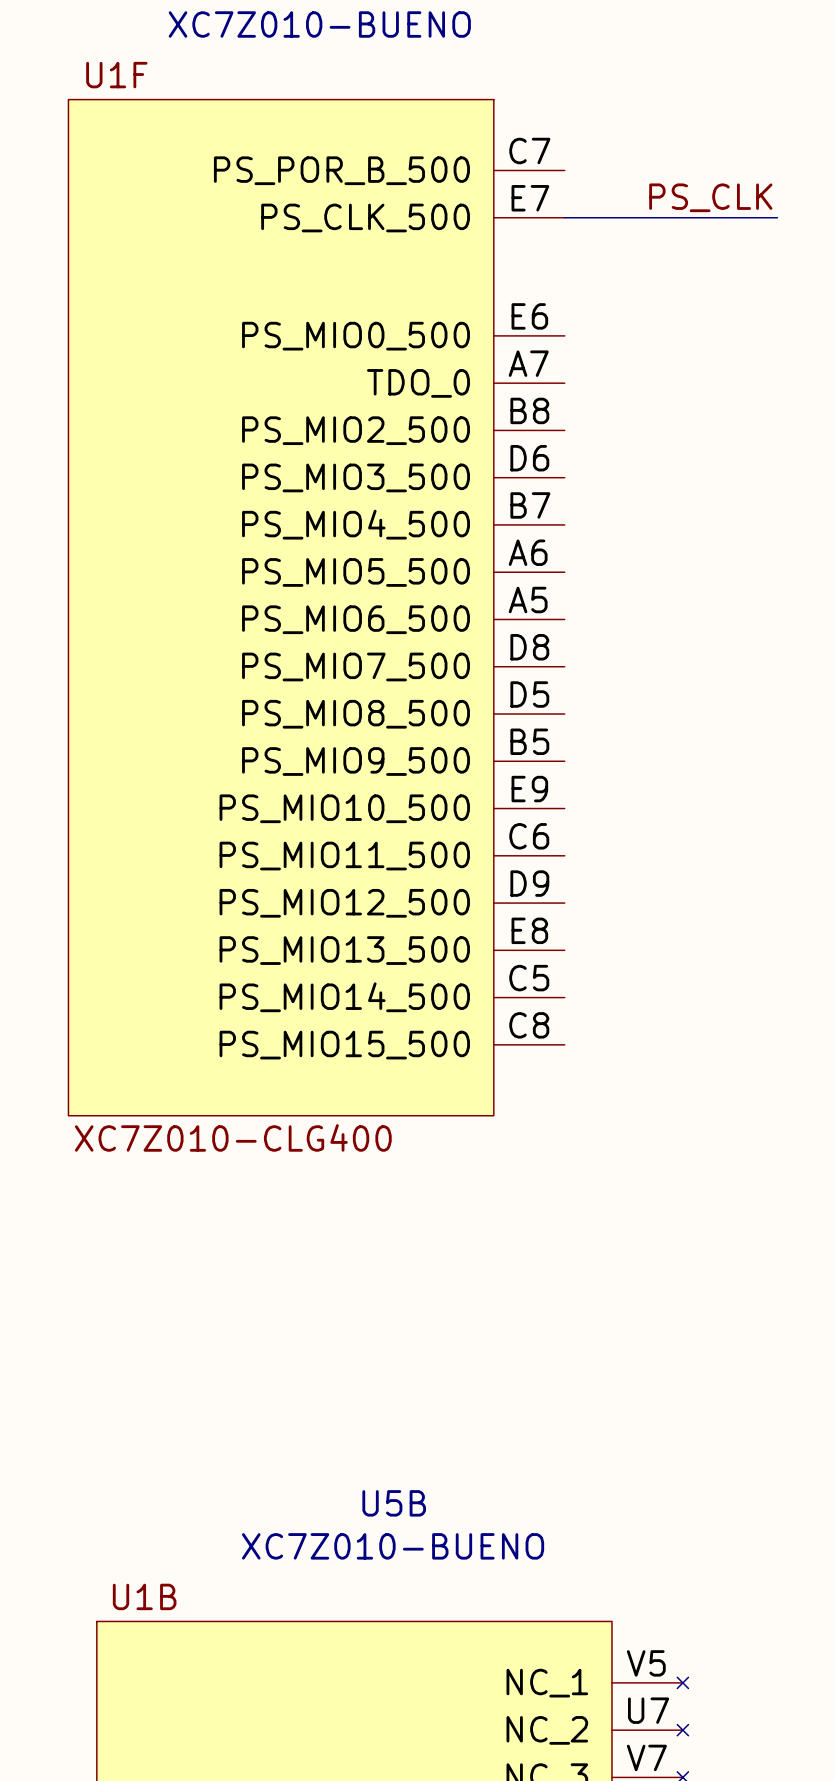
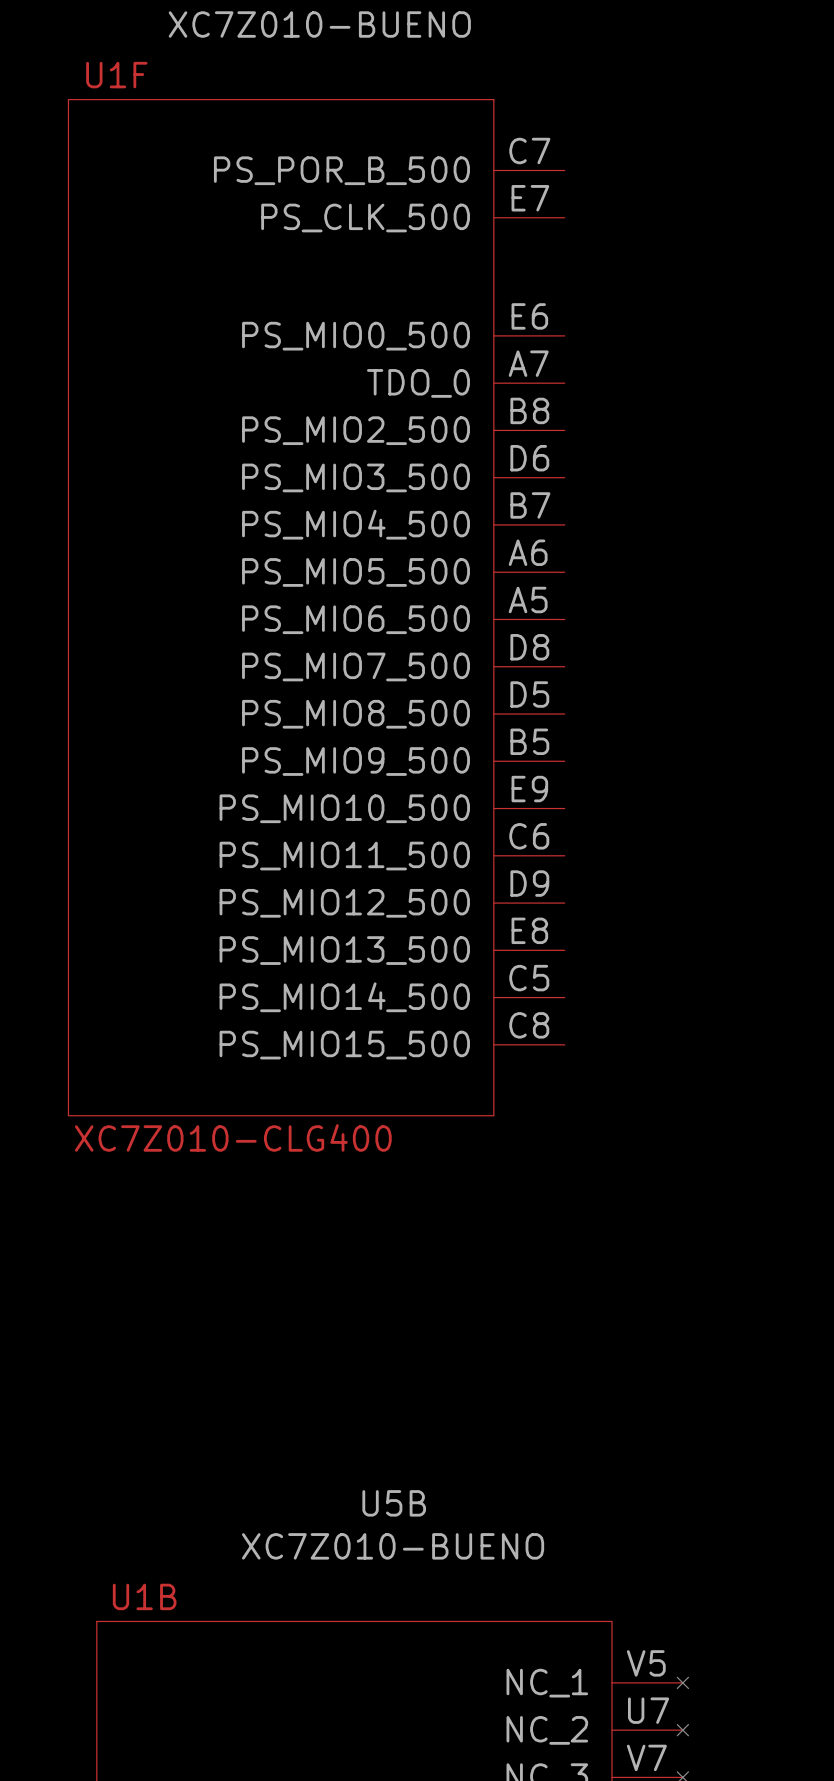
label: PS_CLK (710, 197) -> none
wire: (564, 217) (777, 217) -> none

